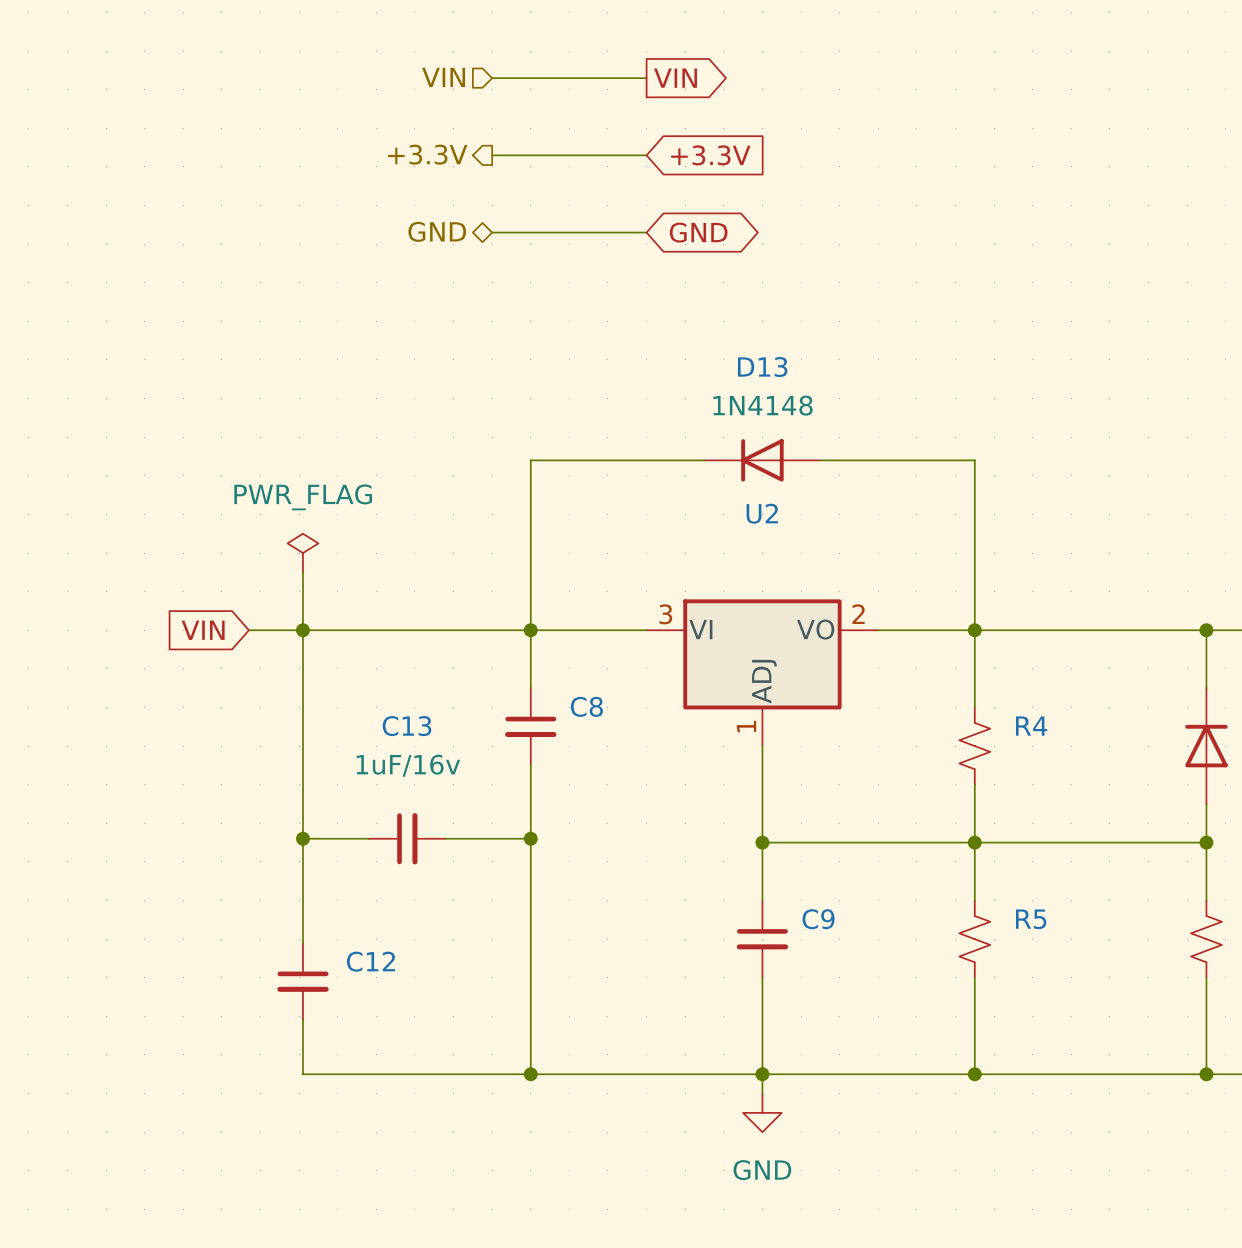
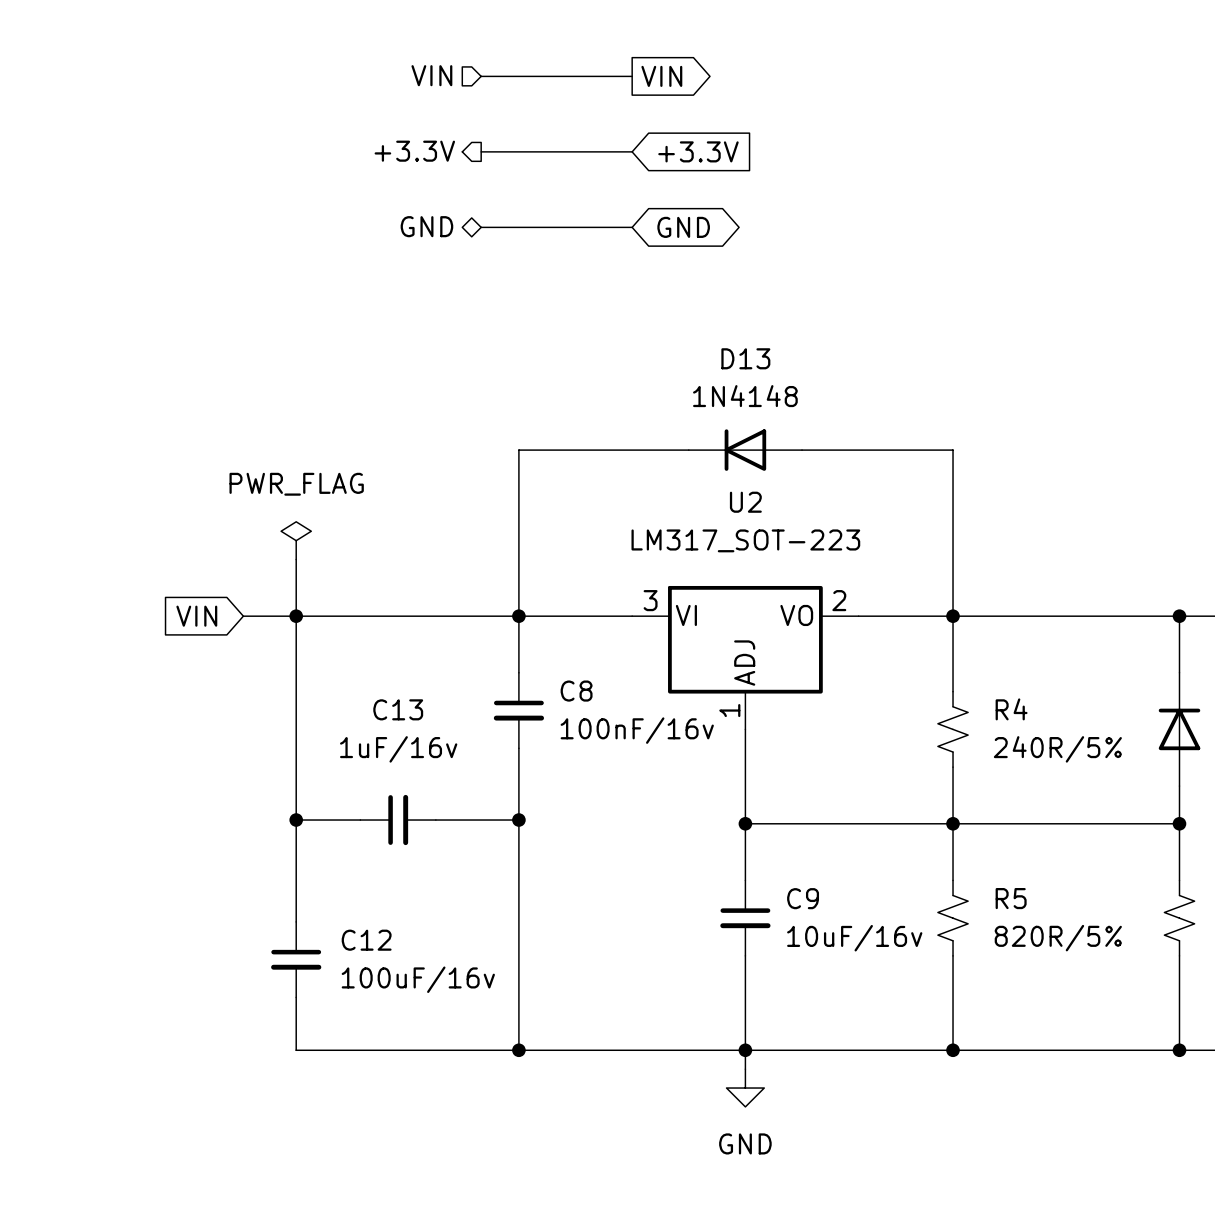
U2 value: none -> LM317_SOT-223 (745, 540)
C8 value: none -> 100nF/16v (637, 730)
R4 value: none -> 240R/5% (1057, 749)
C9 value: none -> 10uF/16v (854, 938)
R5 value: none -> 820R/5% (1058, 938)
C12 value: none -> 100uF/16v (418, 979)

